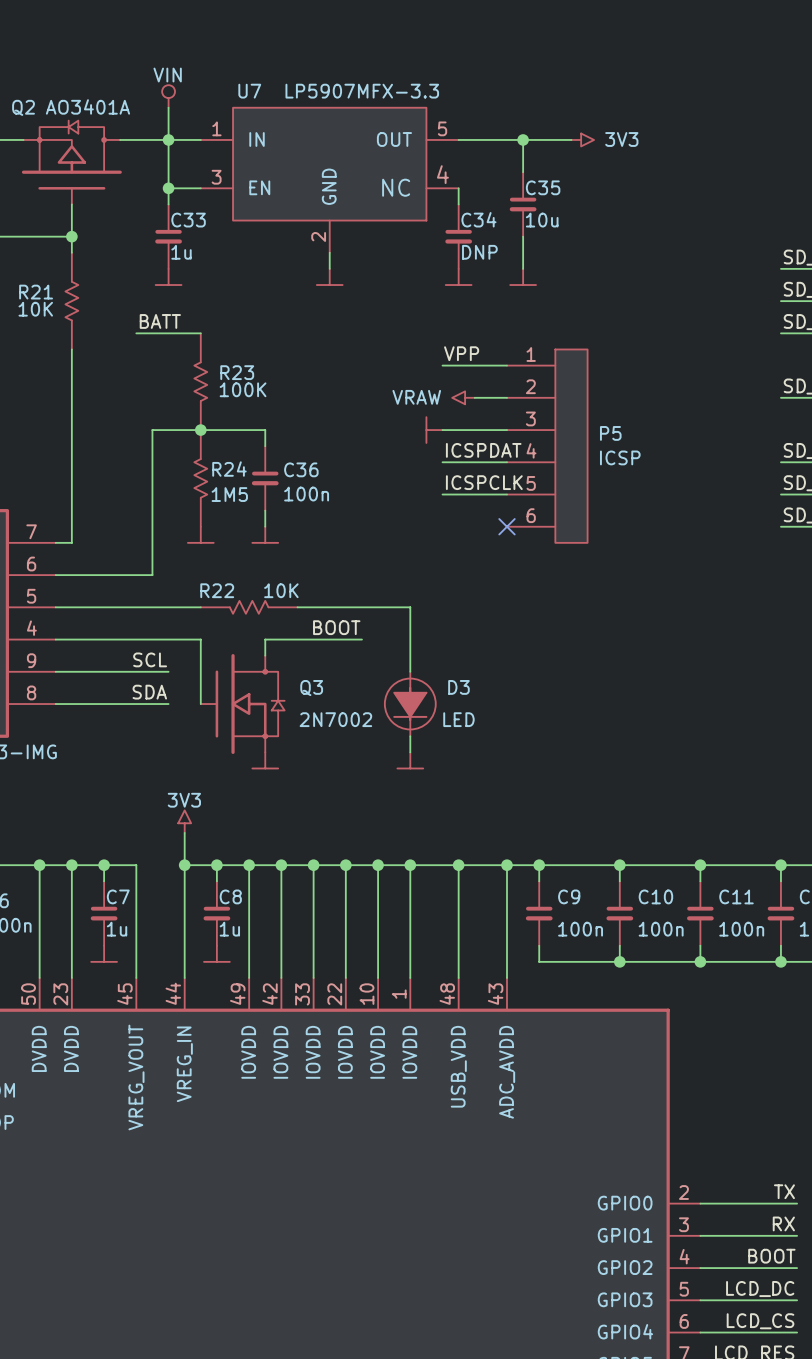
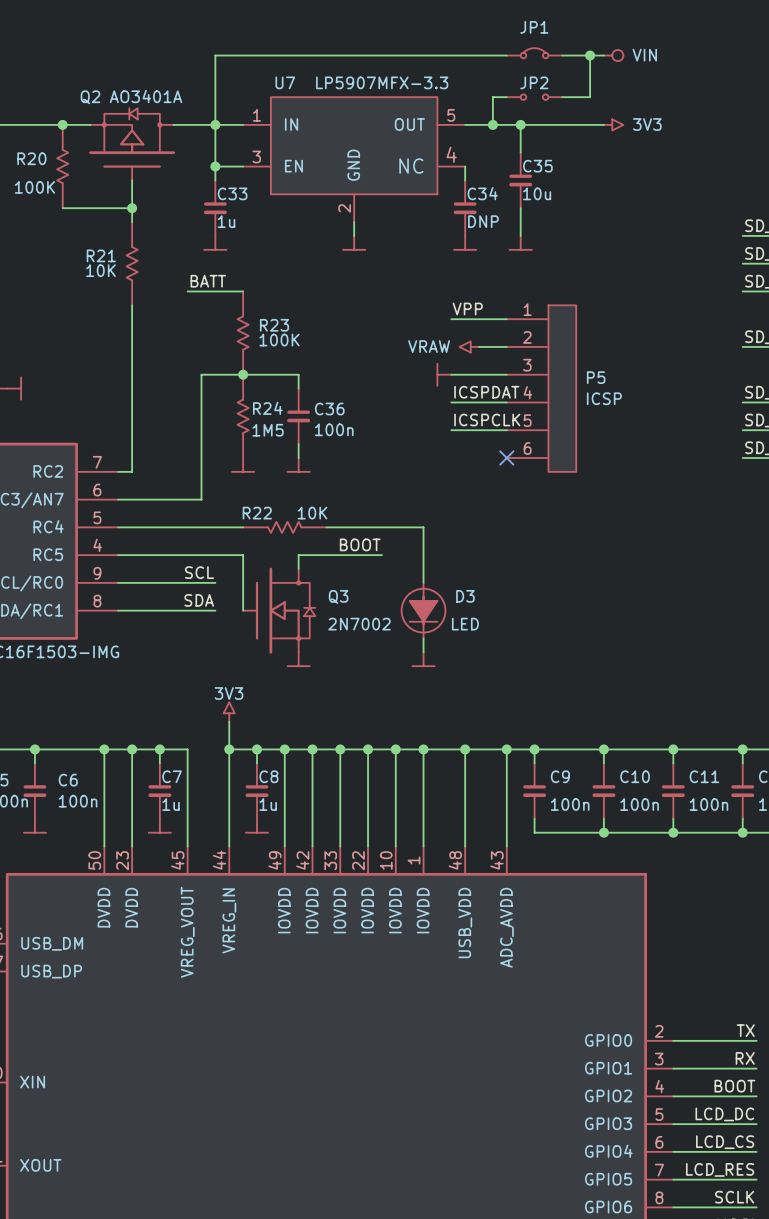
JP1: none -> (534, 53)
wire: none -> (506, 55) (215, 55) (215, 97)
wire: none -> (562, 55) (603, 55)
wire: none -> (590, 55) (590, 97) (562, 97)
junction: none -> (590, 55)
power symbol: none -> VIN (613, 55)
power symbol: VIN (168, 96) -> none
wire: none -> (506, 97) (492, 97) (492, 124)
JP2: none -> (534, 97)
junction: none -> (492, 124)
wire: none -> (562, 124) (603, 124)
power symbol position: 3V3 (582, 139) -> 3V3 (613, 124)

